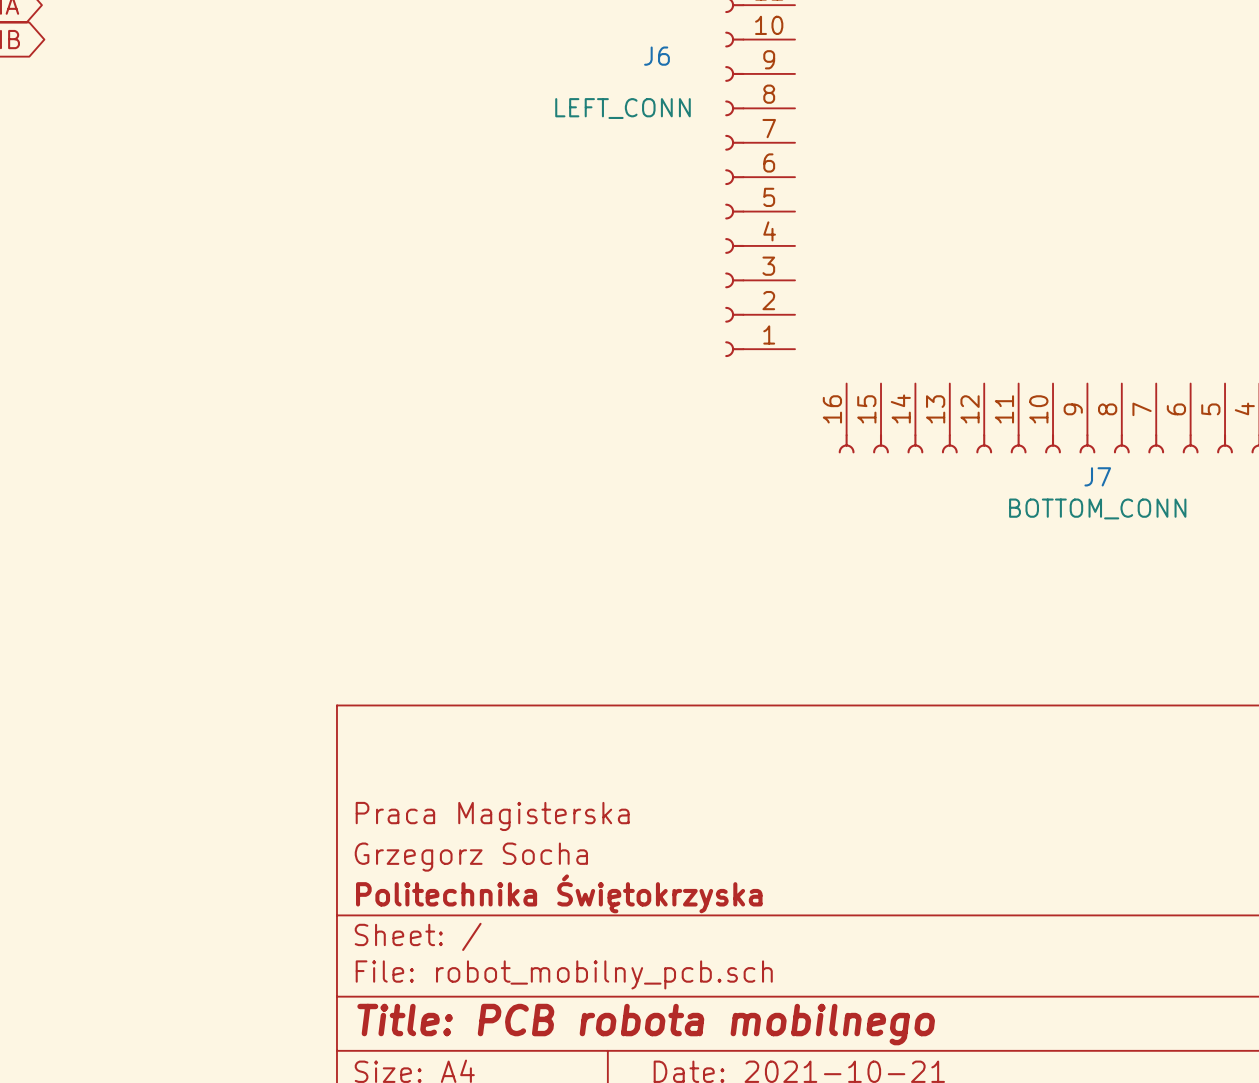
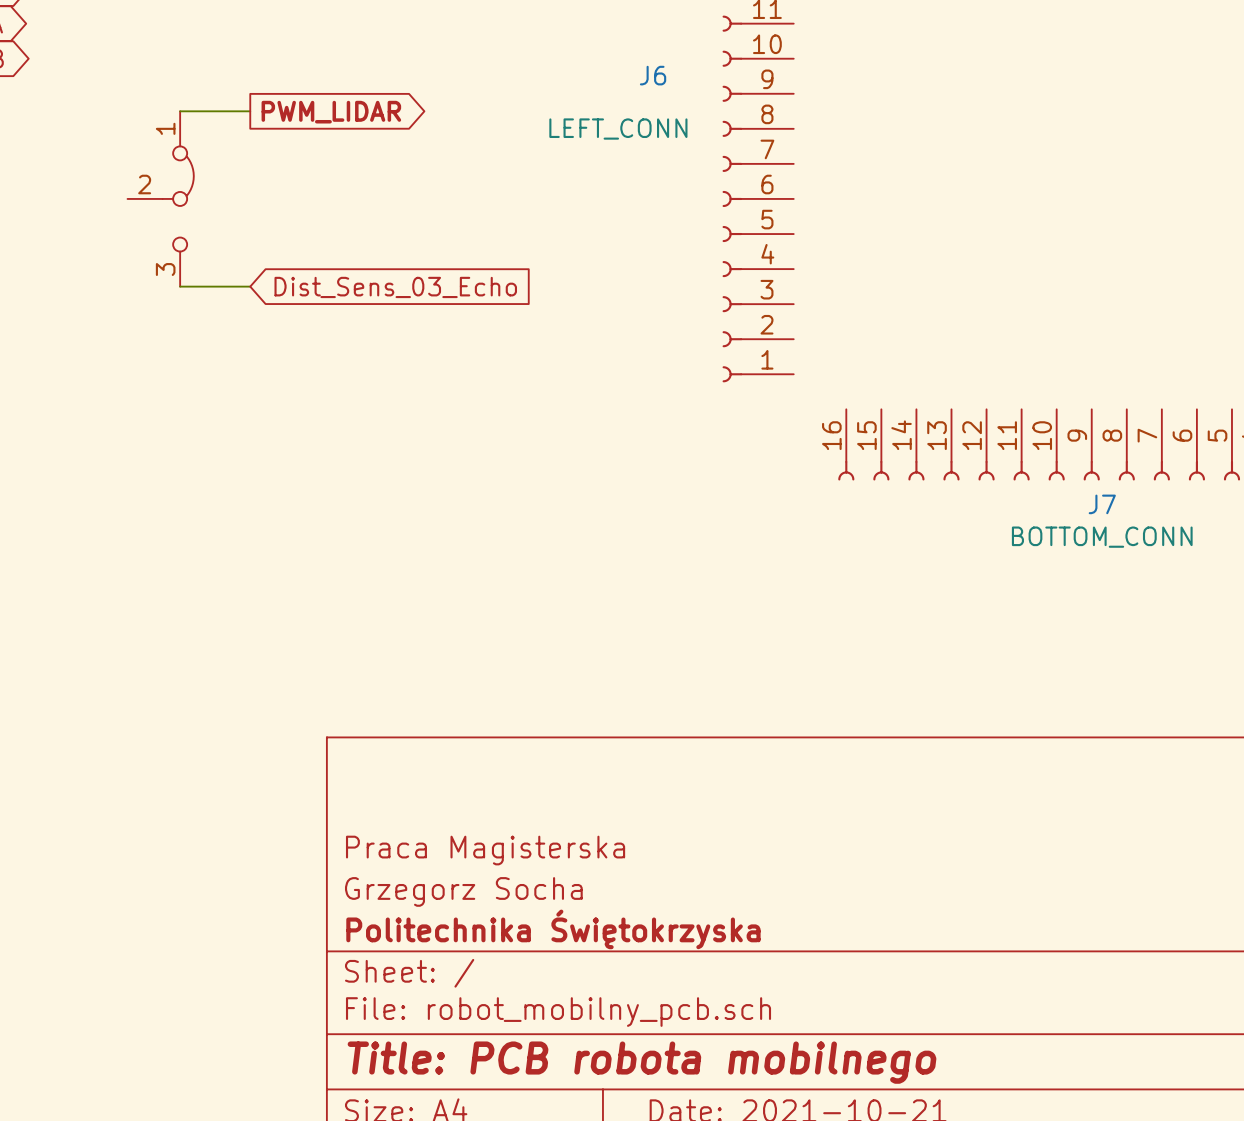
wire: none -> (180, 111) (250, 111)
global label: none -> PWM_LIDAR (331, 112)
part: none -> (160, 198)
wire: none -> (180, 286) (250, 286)
global label: none -> Dist_Sens_03_Echo (395, 287)

